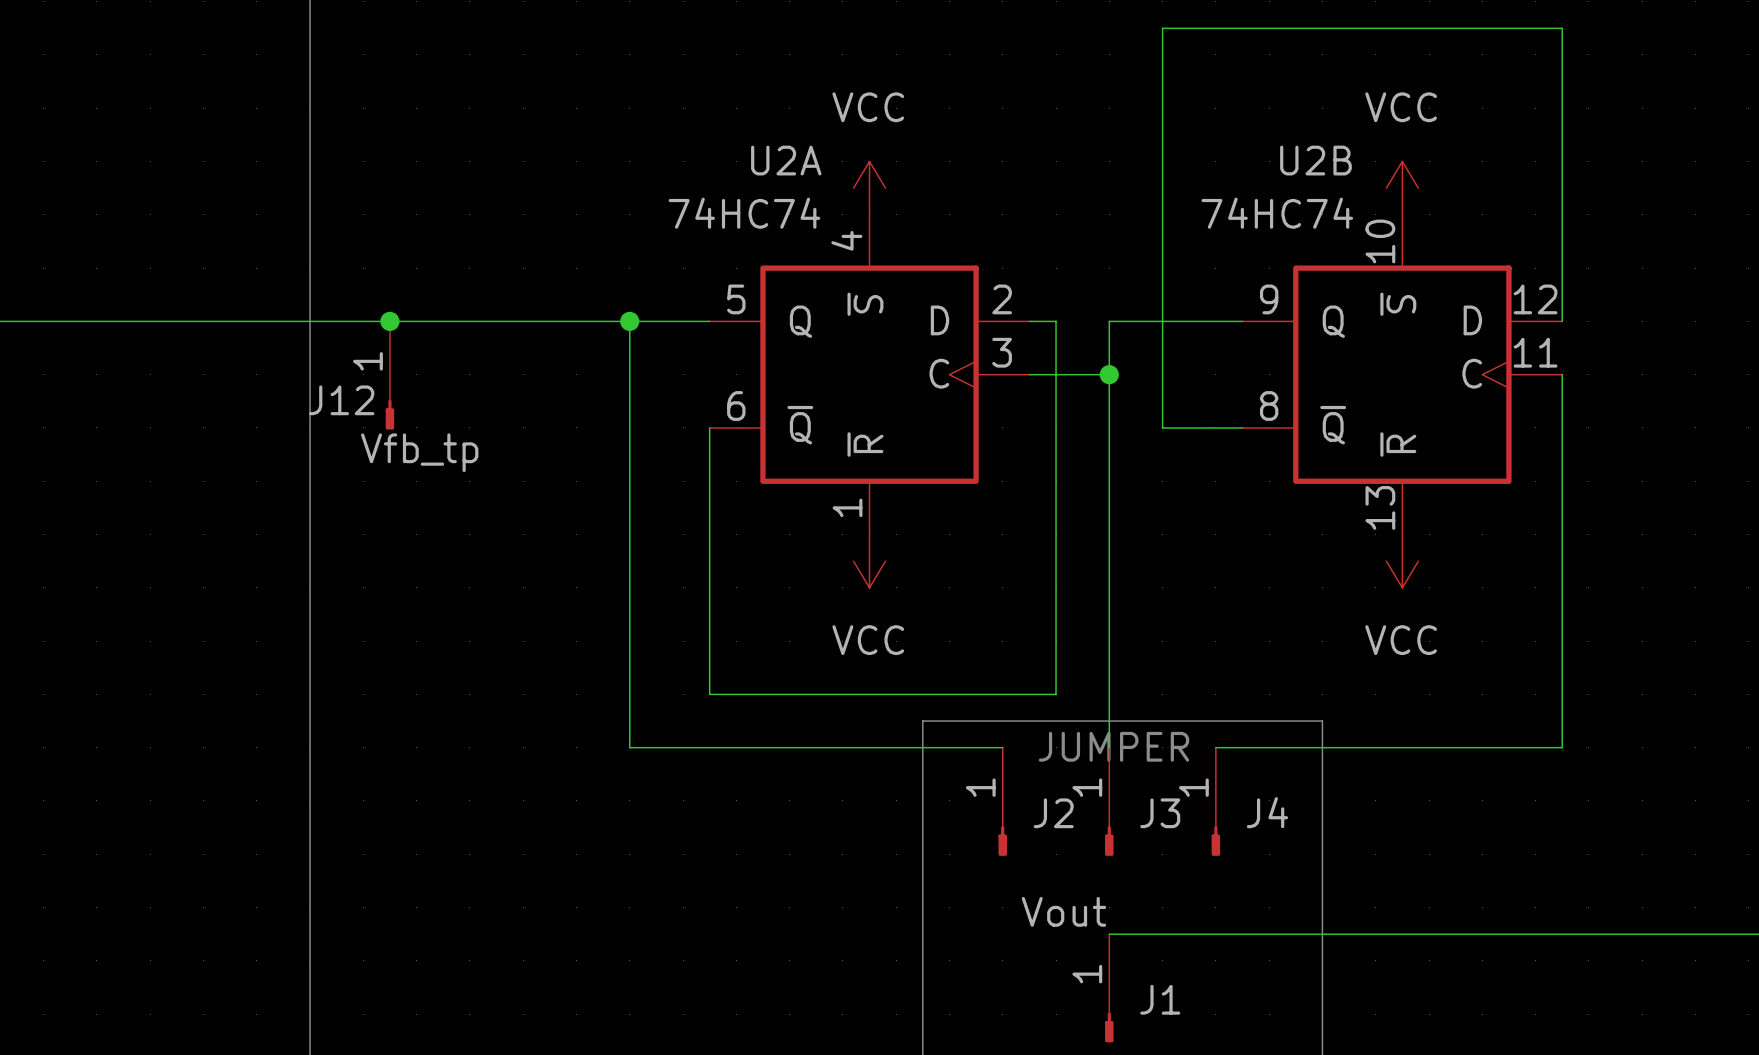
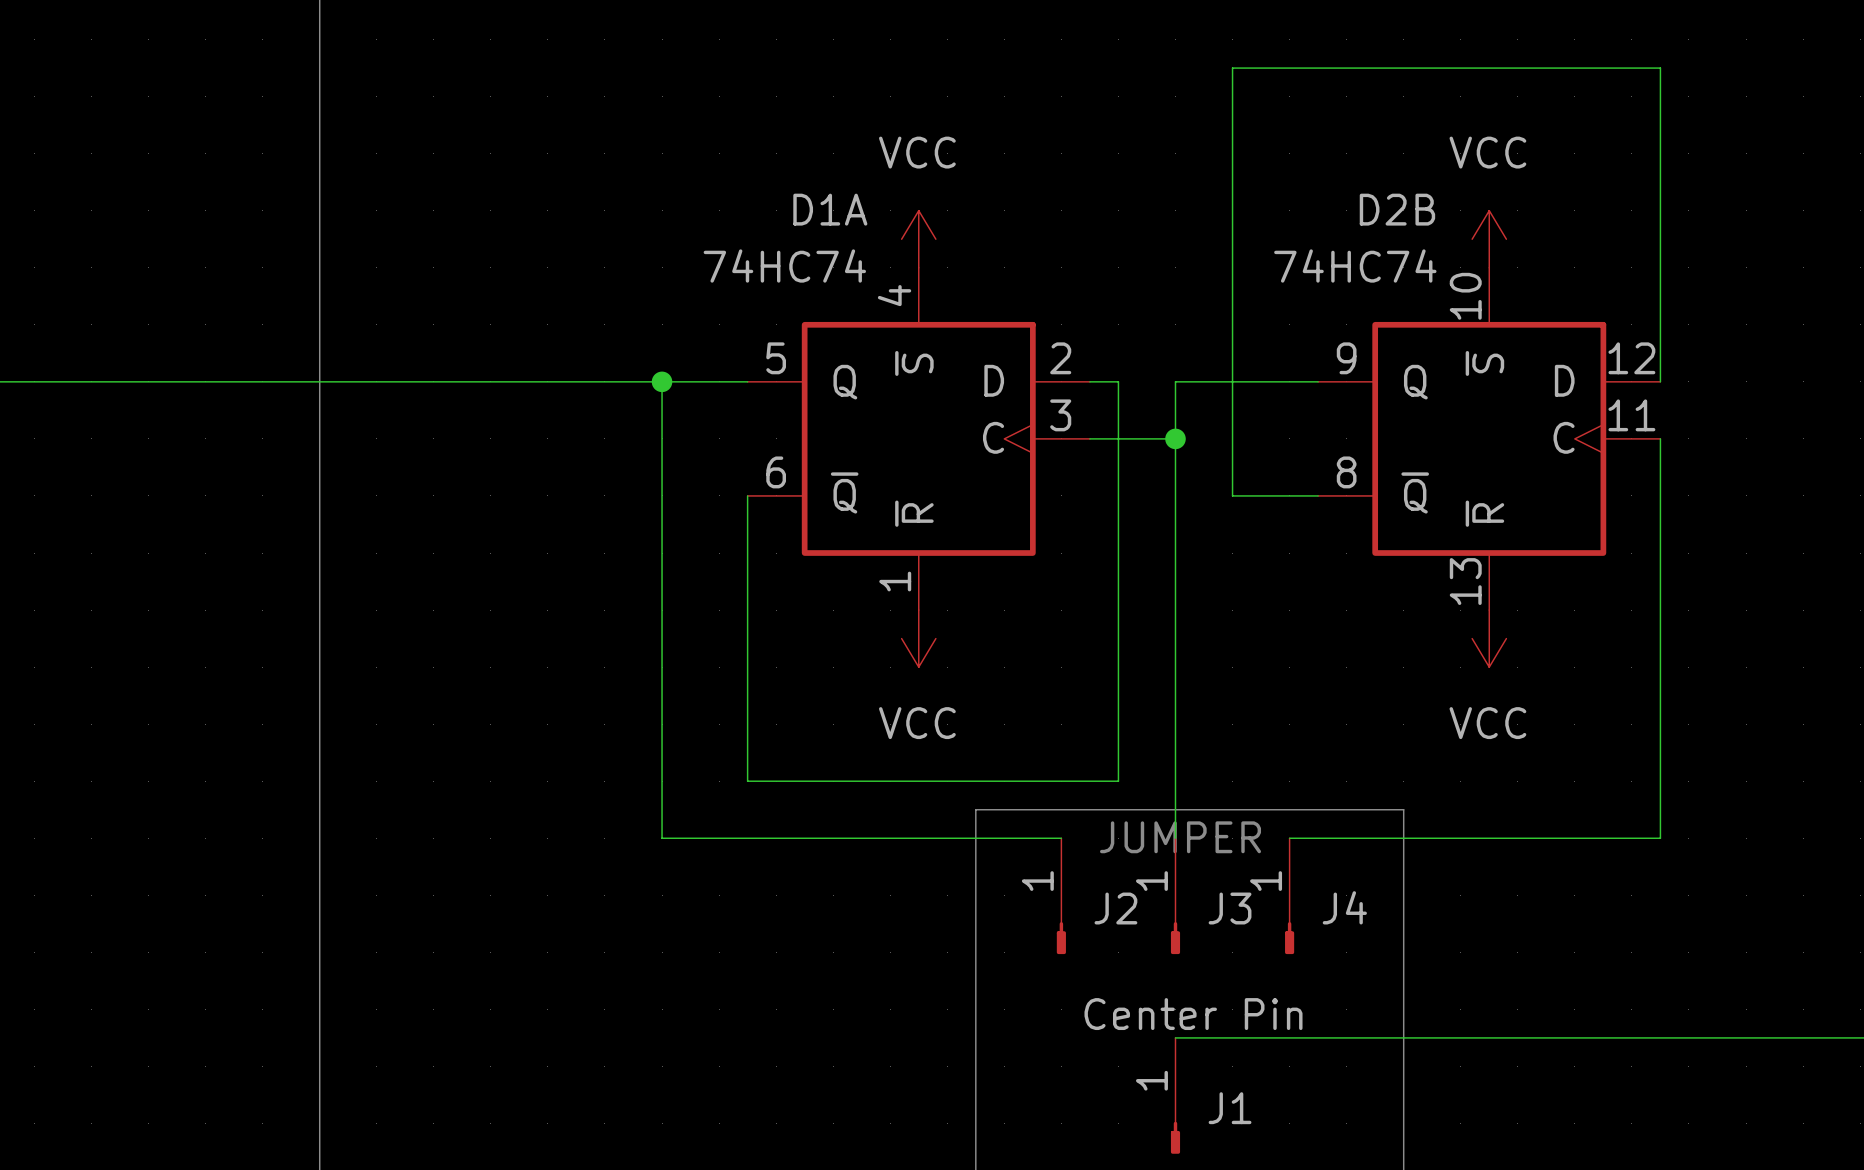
U2A name: U2A (786, 160) -> D1A (830, 209)
U2B name: U2B (1315, 160) -> D2B (1397, 209)
junction: (389, 321) -> none
J12: Vfb_tp (389, 375) -> none
J1 value: Vout (1063, 911) -> Center Pin (1193, 1014)

